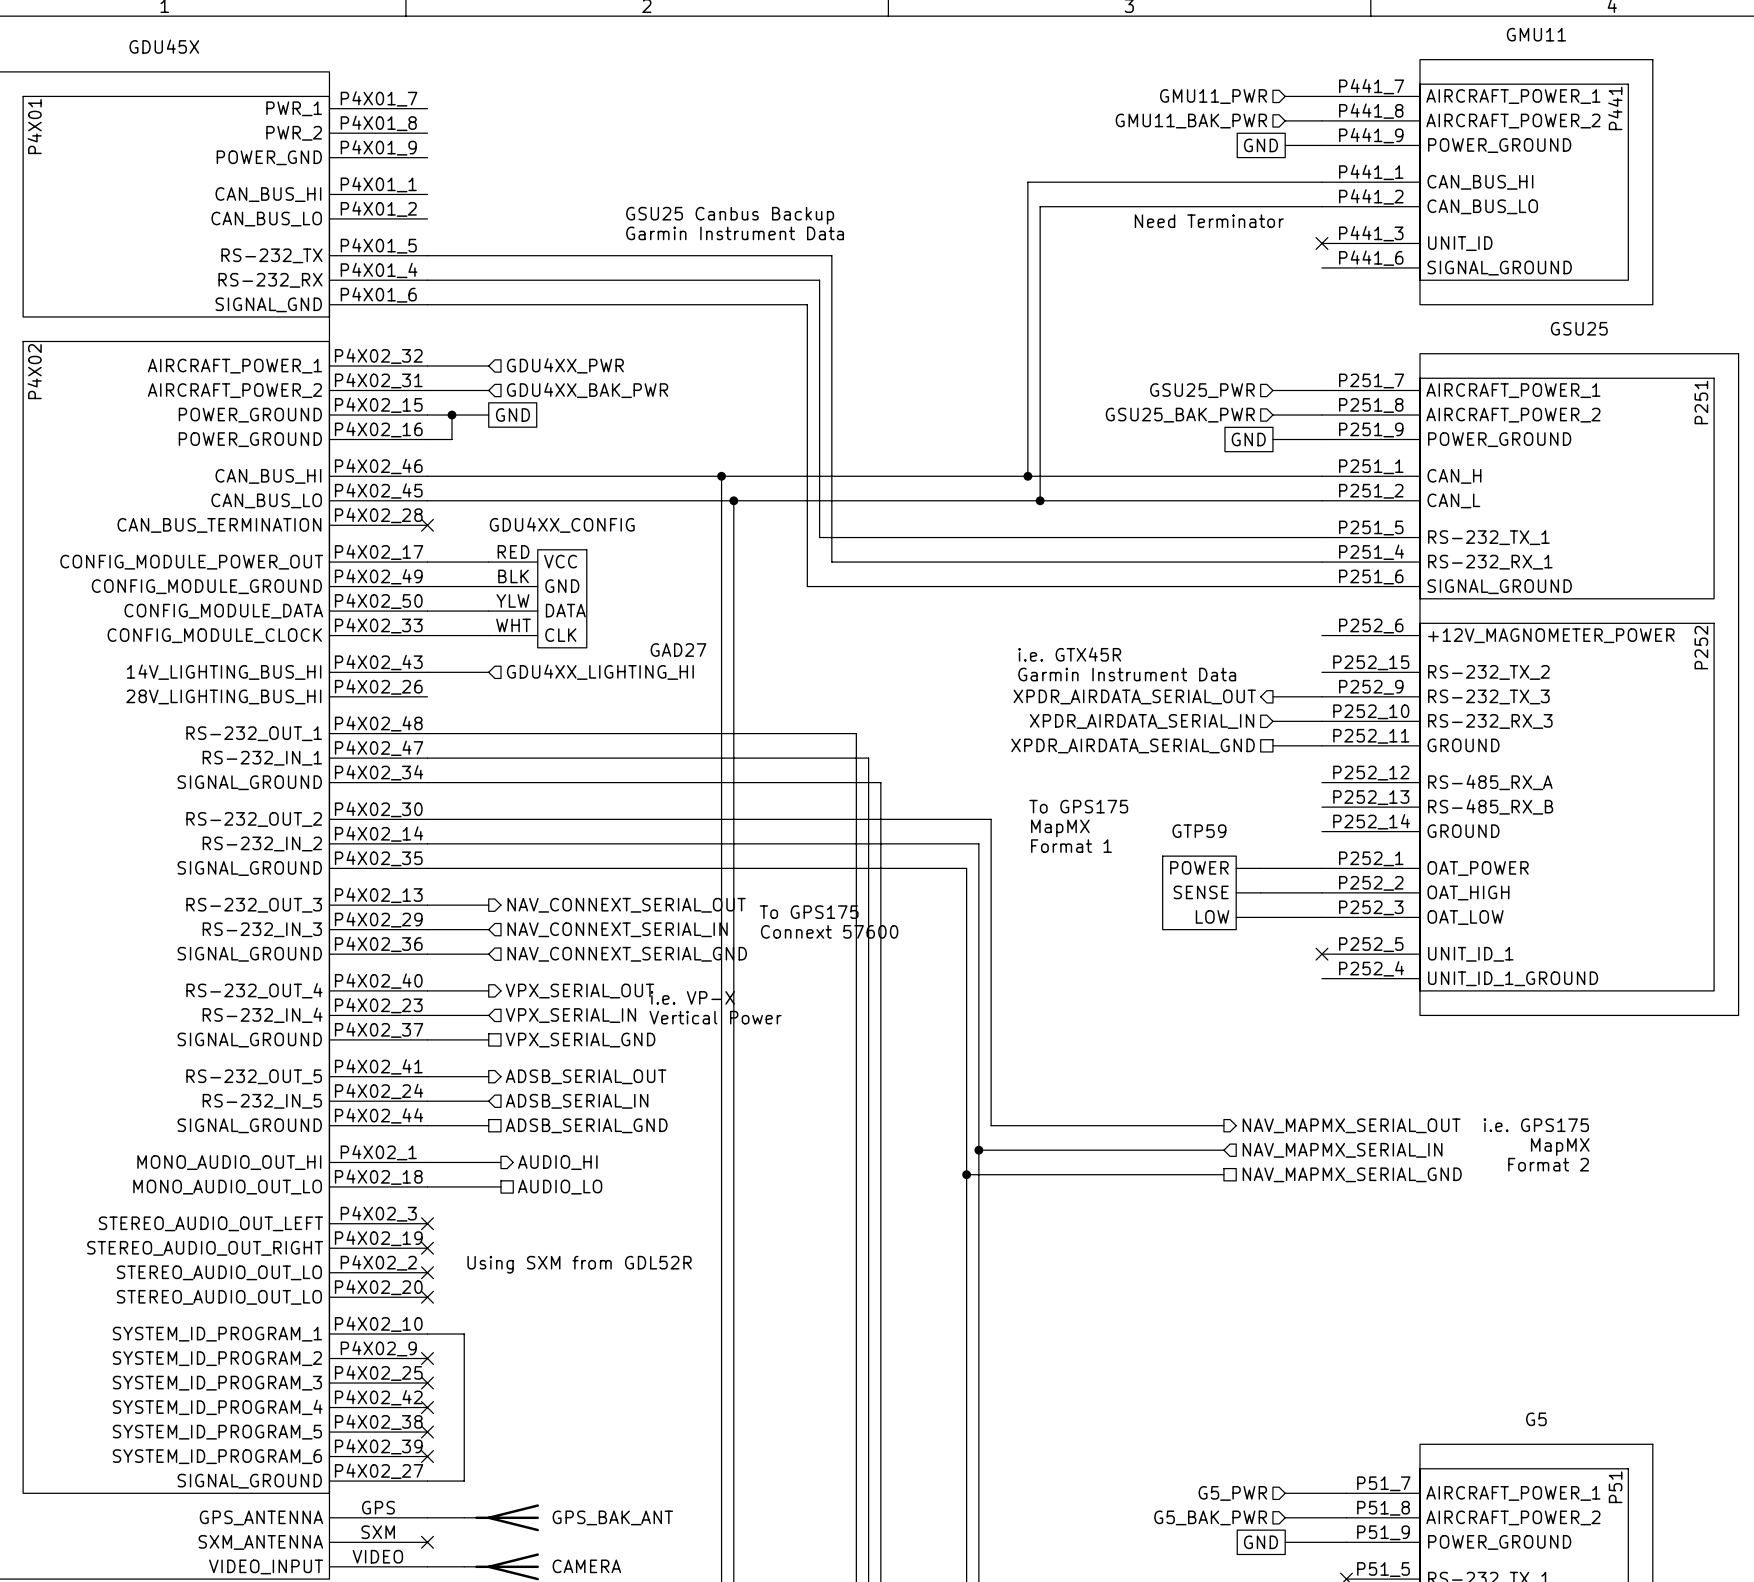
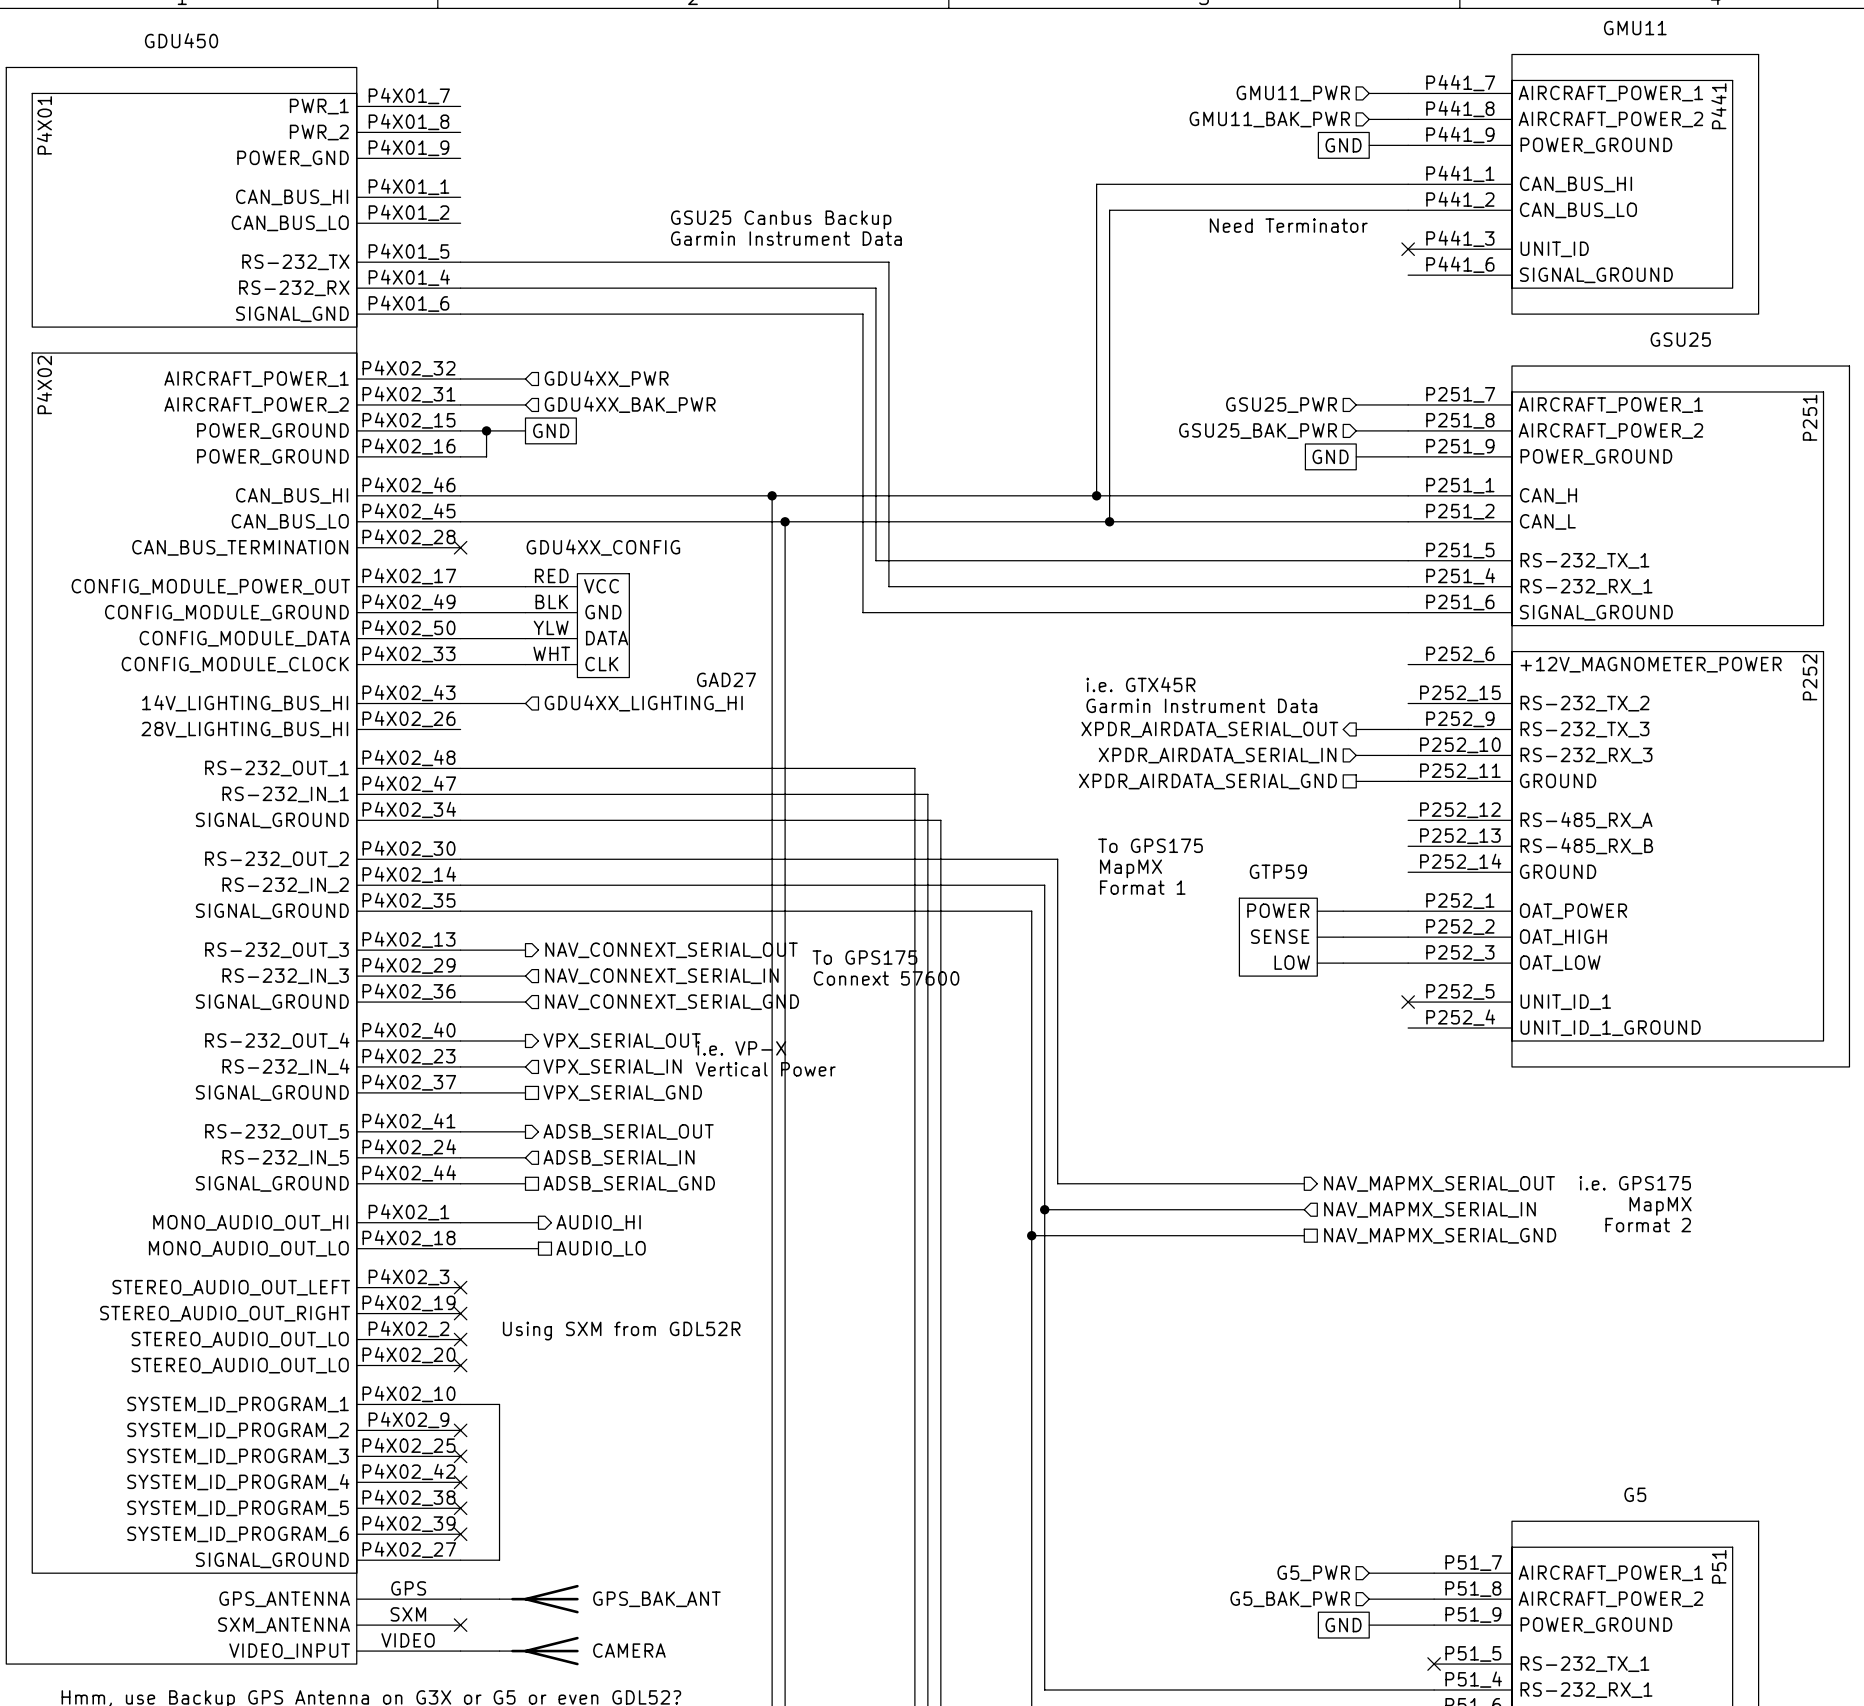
GDU45X name: GDU45X (164, 46) -> GDU450 (181, 40)

